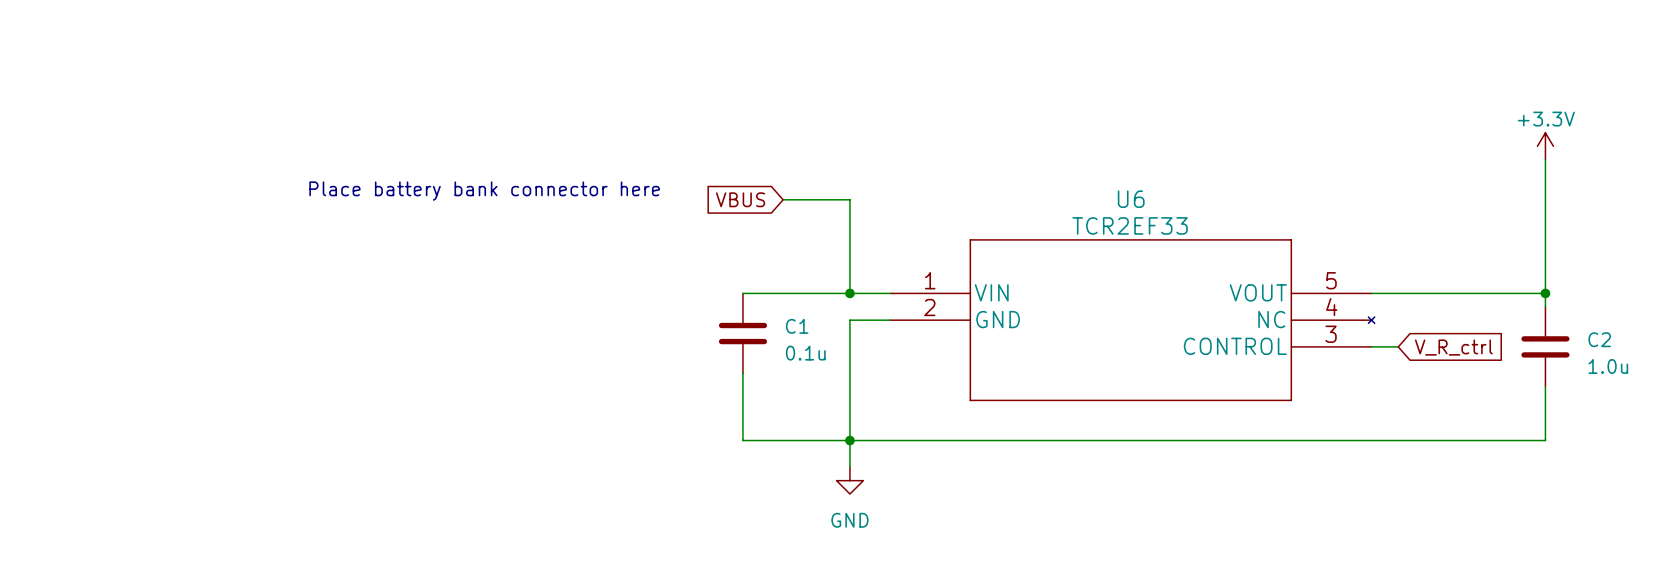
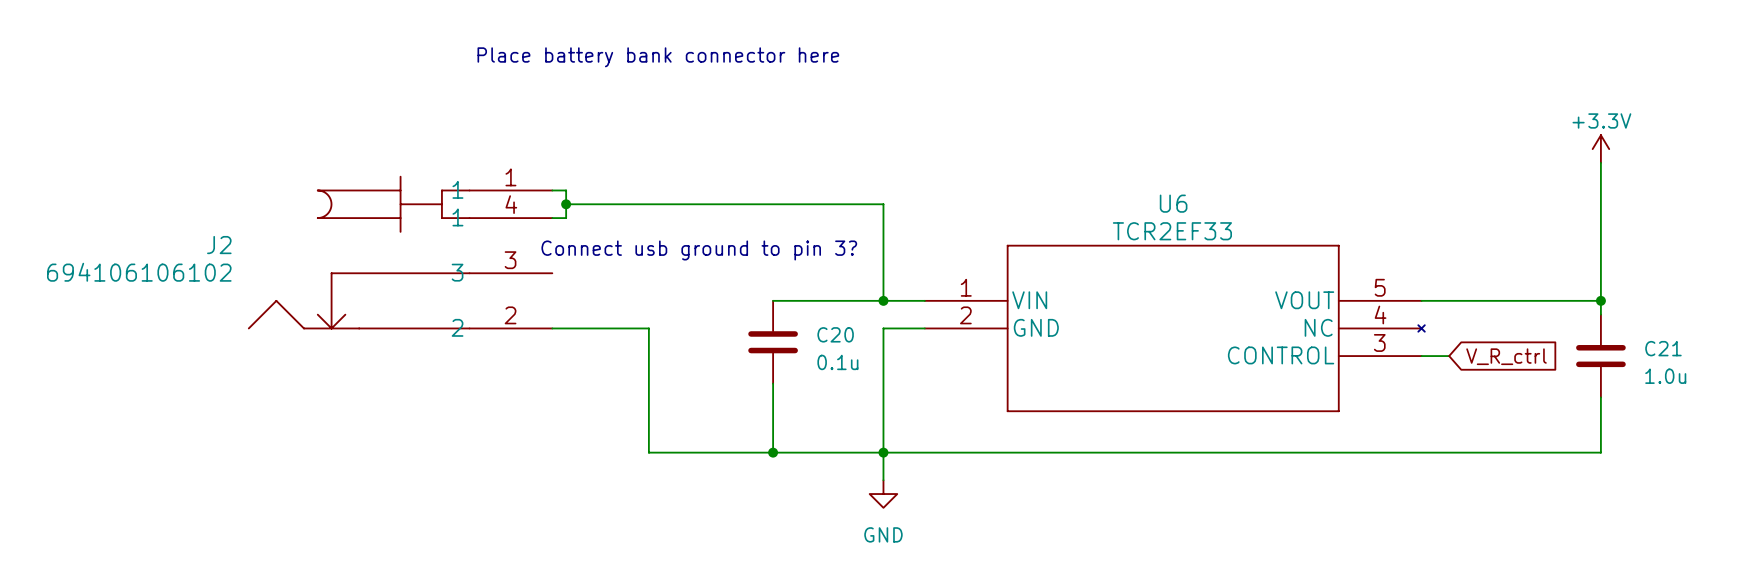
wire: none -> (552, 190) (566, 190) (566, 218) (552, 218)
text position: Place battery bank connector here (484, 191) -> Place battery bank connector here (658, 57)
wire: none -> (566, 204) (814, 204)
junction: none -> (566, 204)
global label: VBUS (740, 199) -> none
text: none -> Connect usb ground to pin 3? (699, 250)
J2: none -> 694106106102 (400, 252)
wire: none -> (552, 328) (648, 328) (648, 452) (773, 452)
C1 name: C1 (797, 326) -> C20 (835, 334)
C2 name: C2 (1599, 339) -> C21 (1663, 348)
junction: none -> (773, 452)

